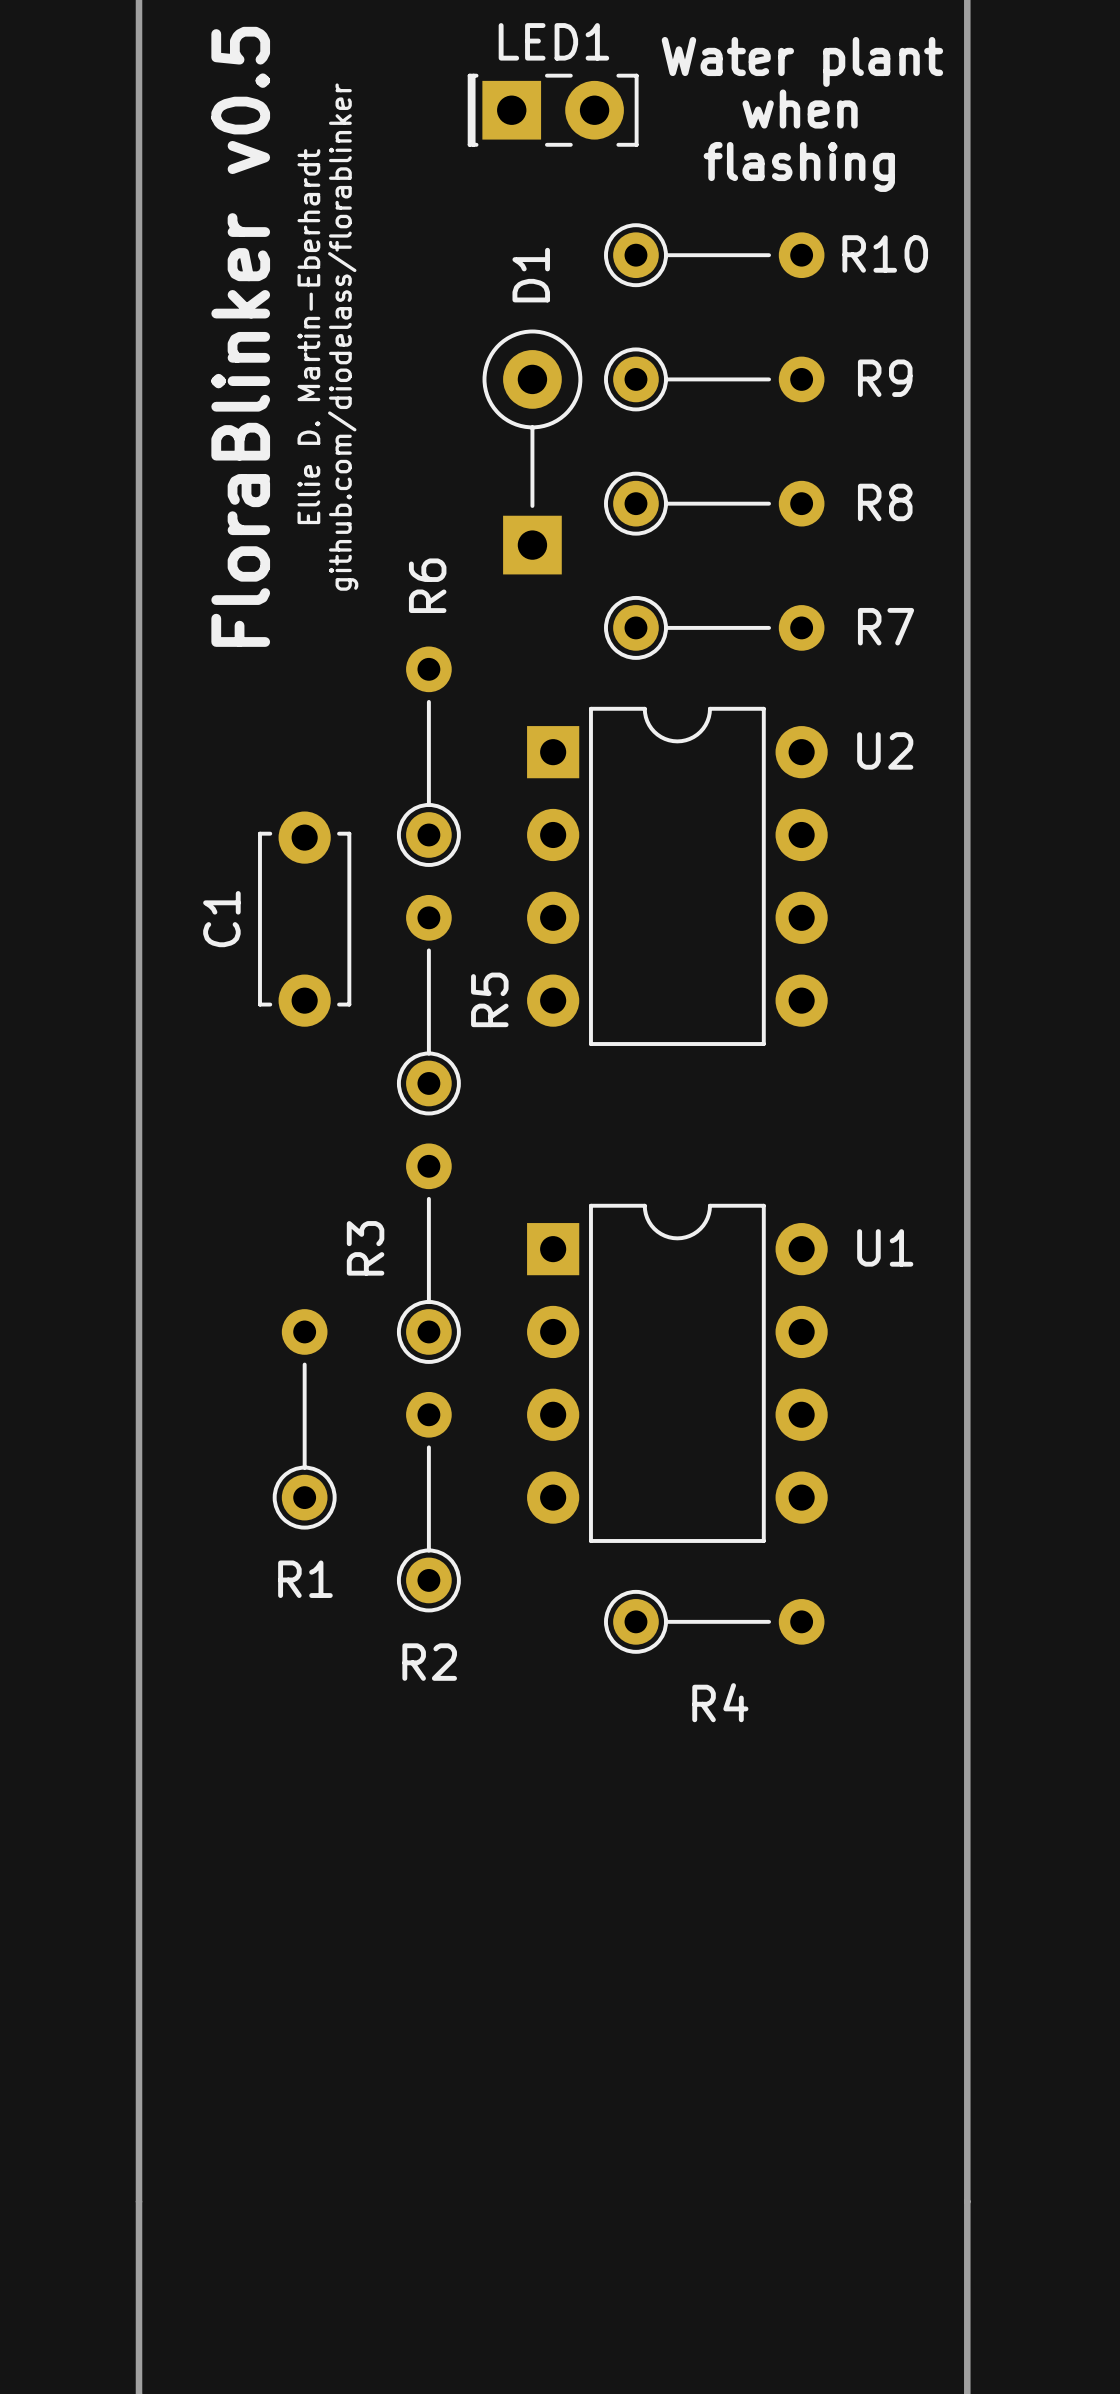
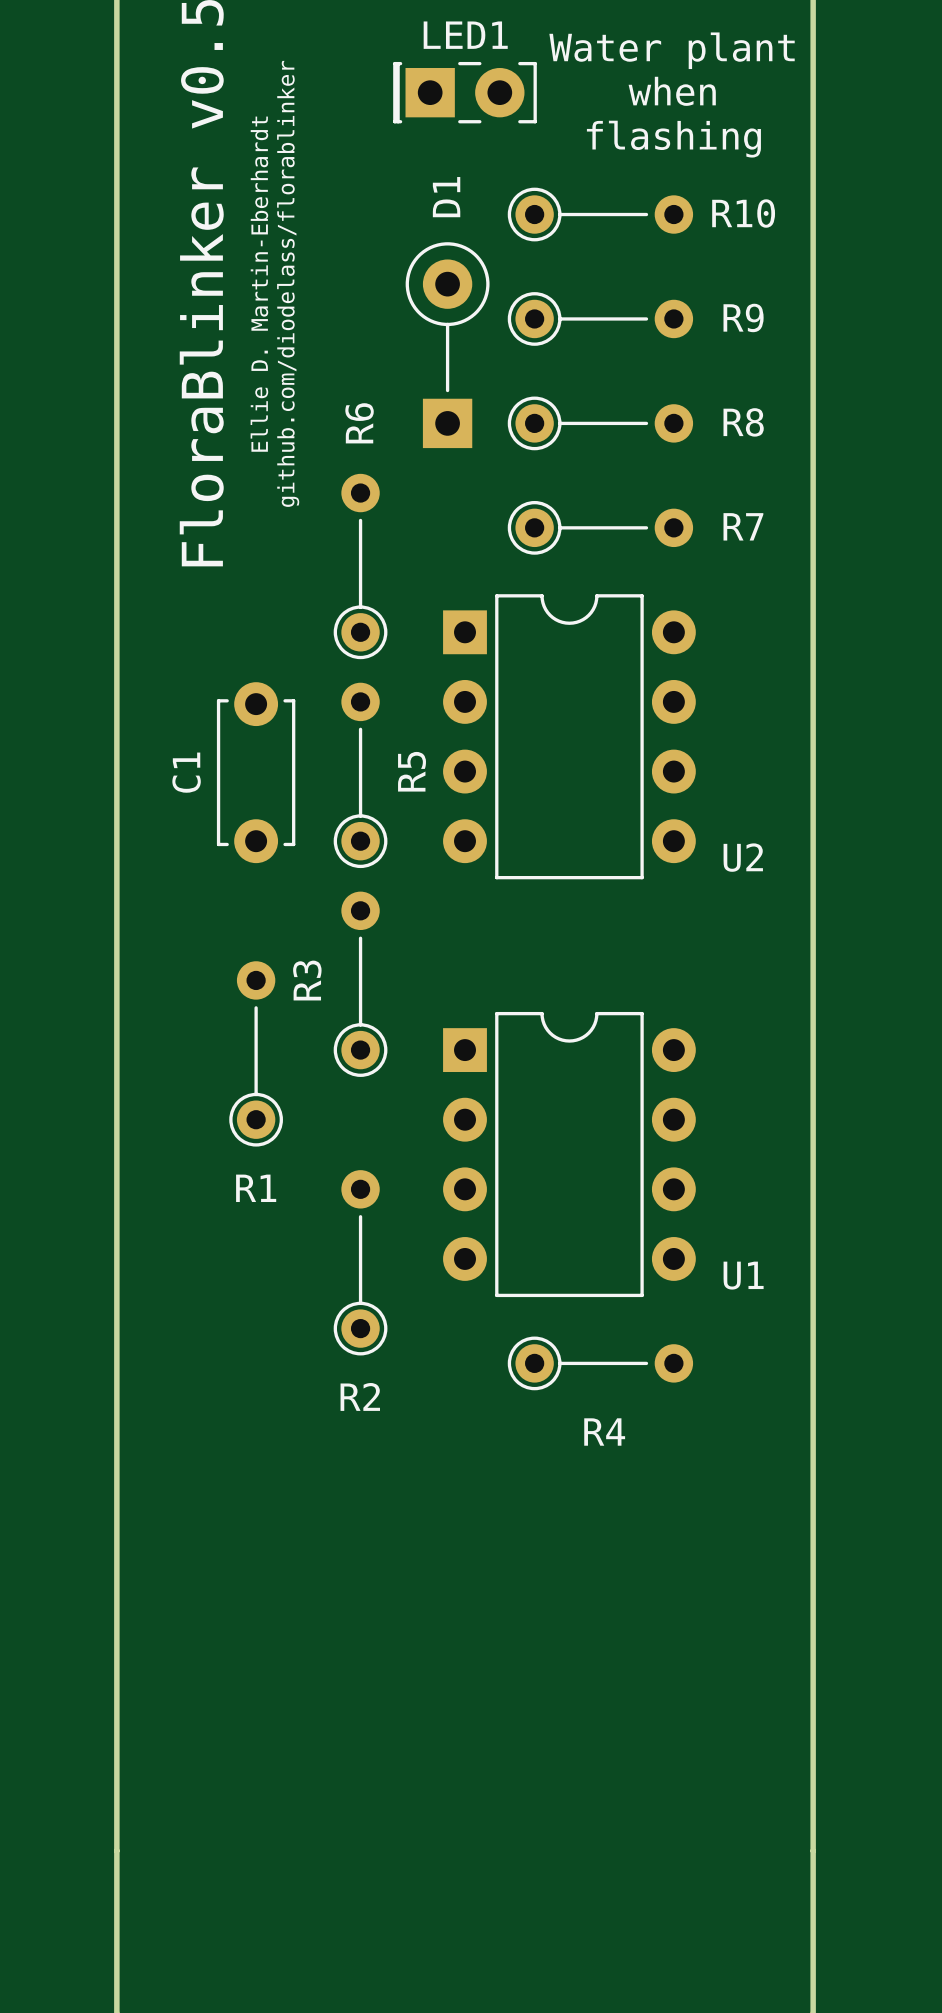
D1 position: (532, 451) -> (447, 345)
U2 name position: U2 (885, 750) -> U2 (743, 857)
R6 position: (428, 756) -> (360, 566)
R5 position: (428, 1005) -> (360, 775)
U1 name position: U1 (885, 1247) -> U1 (743, 1275)
R3 position: (428, 1253) -> (360, 984)
R1 position: (304, 1419) -> (256, 1053)

